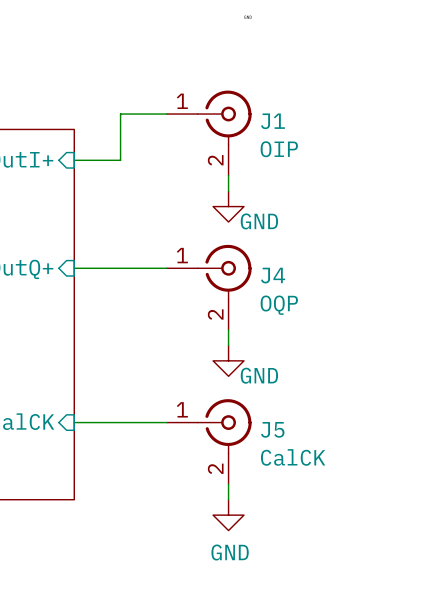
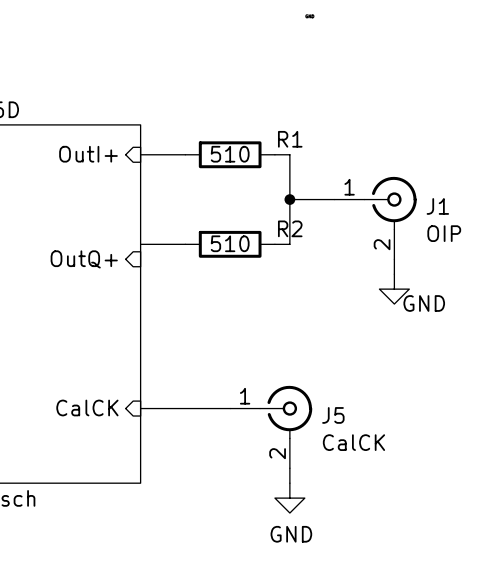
wire: (166, 114) (120, 114) (120, 160) -> none
J1 position: (209, 133) -> (375, 218)
R1: none -> 510 (230, 154)
wire: none -> (289, 184) (289, 244) (274, 244)
wire: none -> (289, 199) (334, 199)
power symbol: GND (228, 206) -> none
junction: none -> (289, 199)
wire: none -> (140, 244) (185, 244)
R2: none -> 510 (230, 244)
wire: (74, 268) (166, 268) -> none
J4: OQP (209, 287) -> none
power symbol: none -> GND (394, 289)
wire: (228, 330) (228, 345) -> (394, 259) (394, 274)
power symbol: GND (228, 360) -> none

